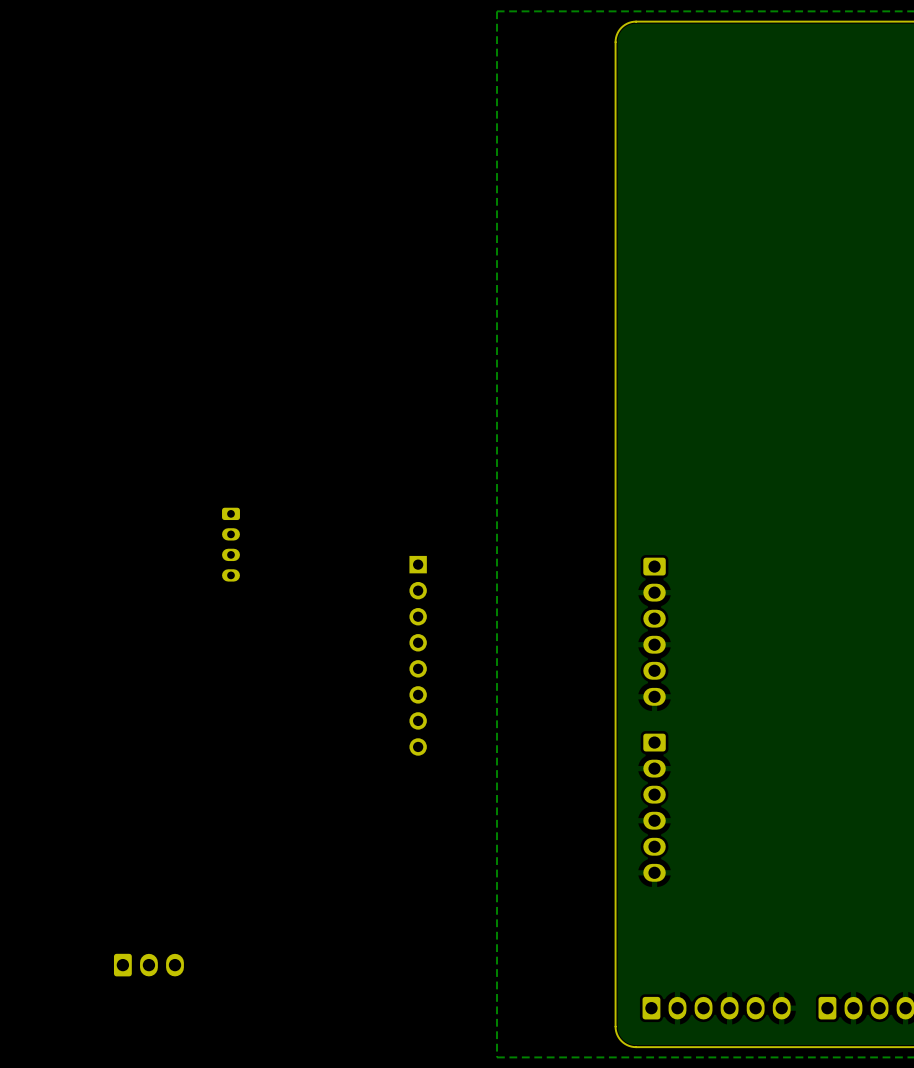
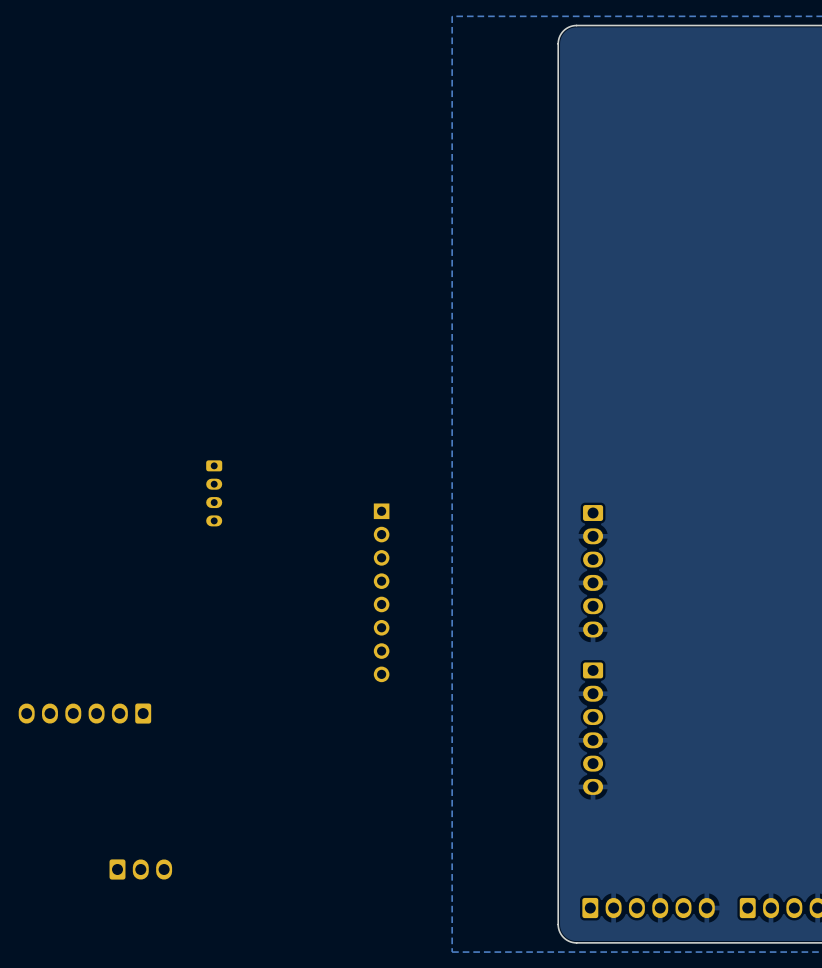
part: none -> (84, 713)

